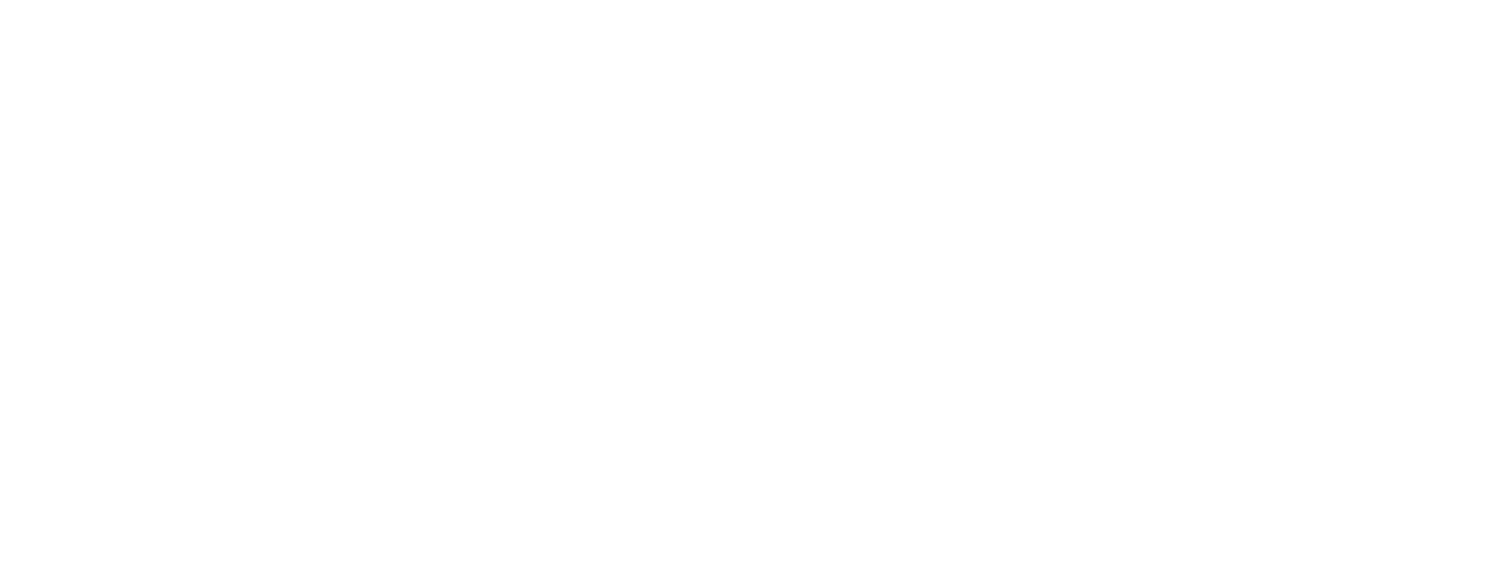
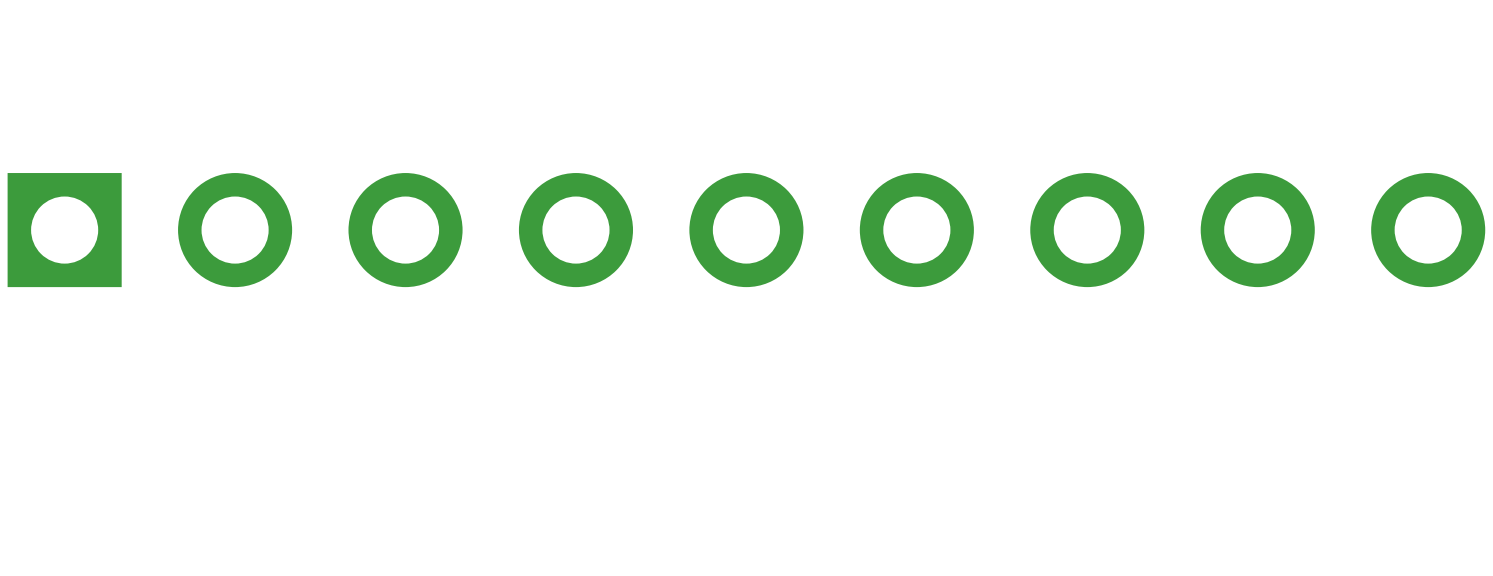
part: none -> (746, 230)

